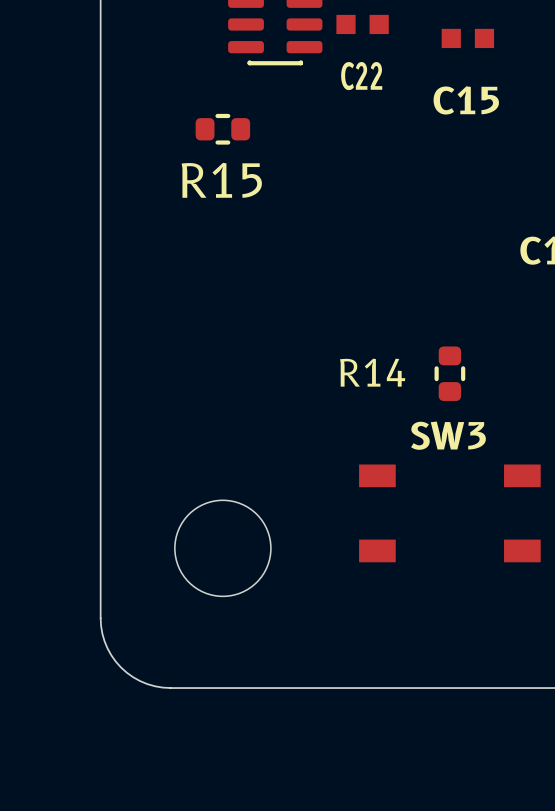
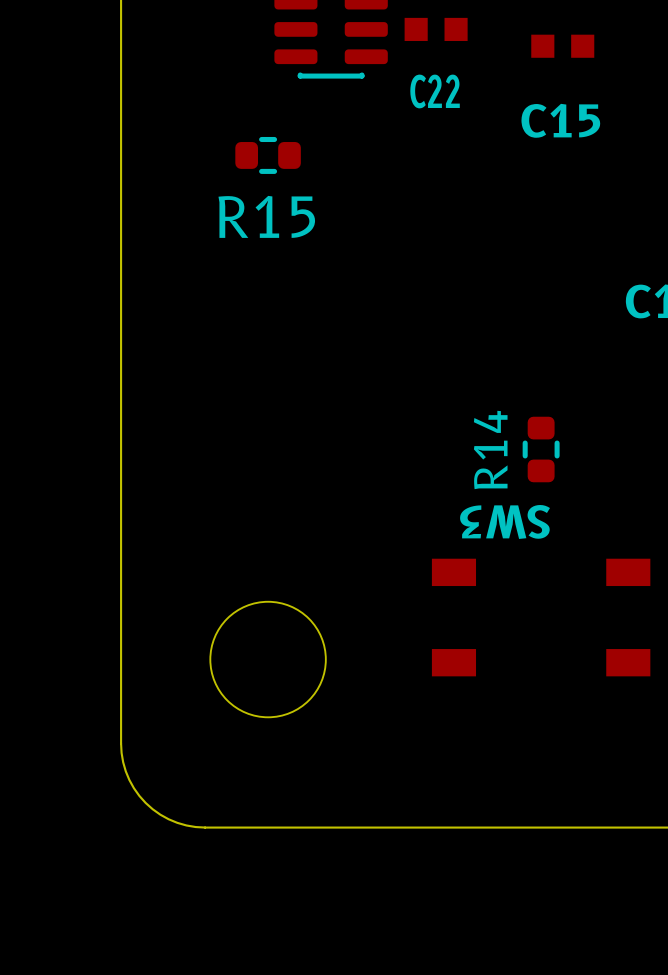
R14 name rotation: 0° (372, 372) -> 90° counterclockwise (490, 450)
SW3 name rotation: 0° (448, 435) -> 180° (505, 521)

